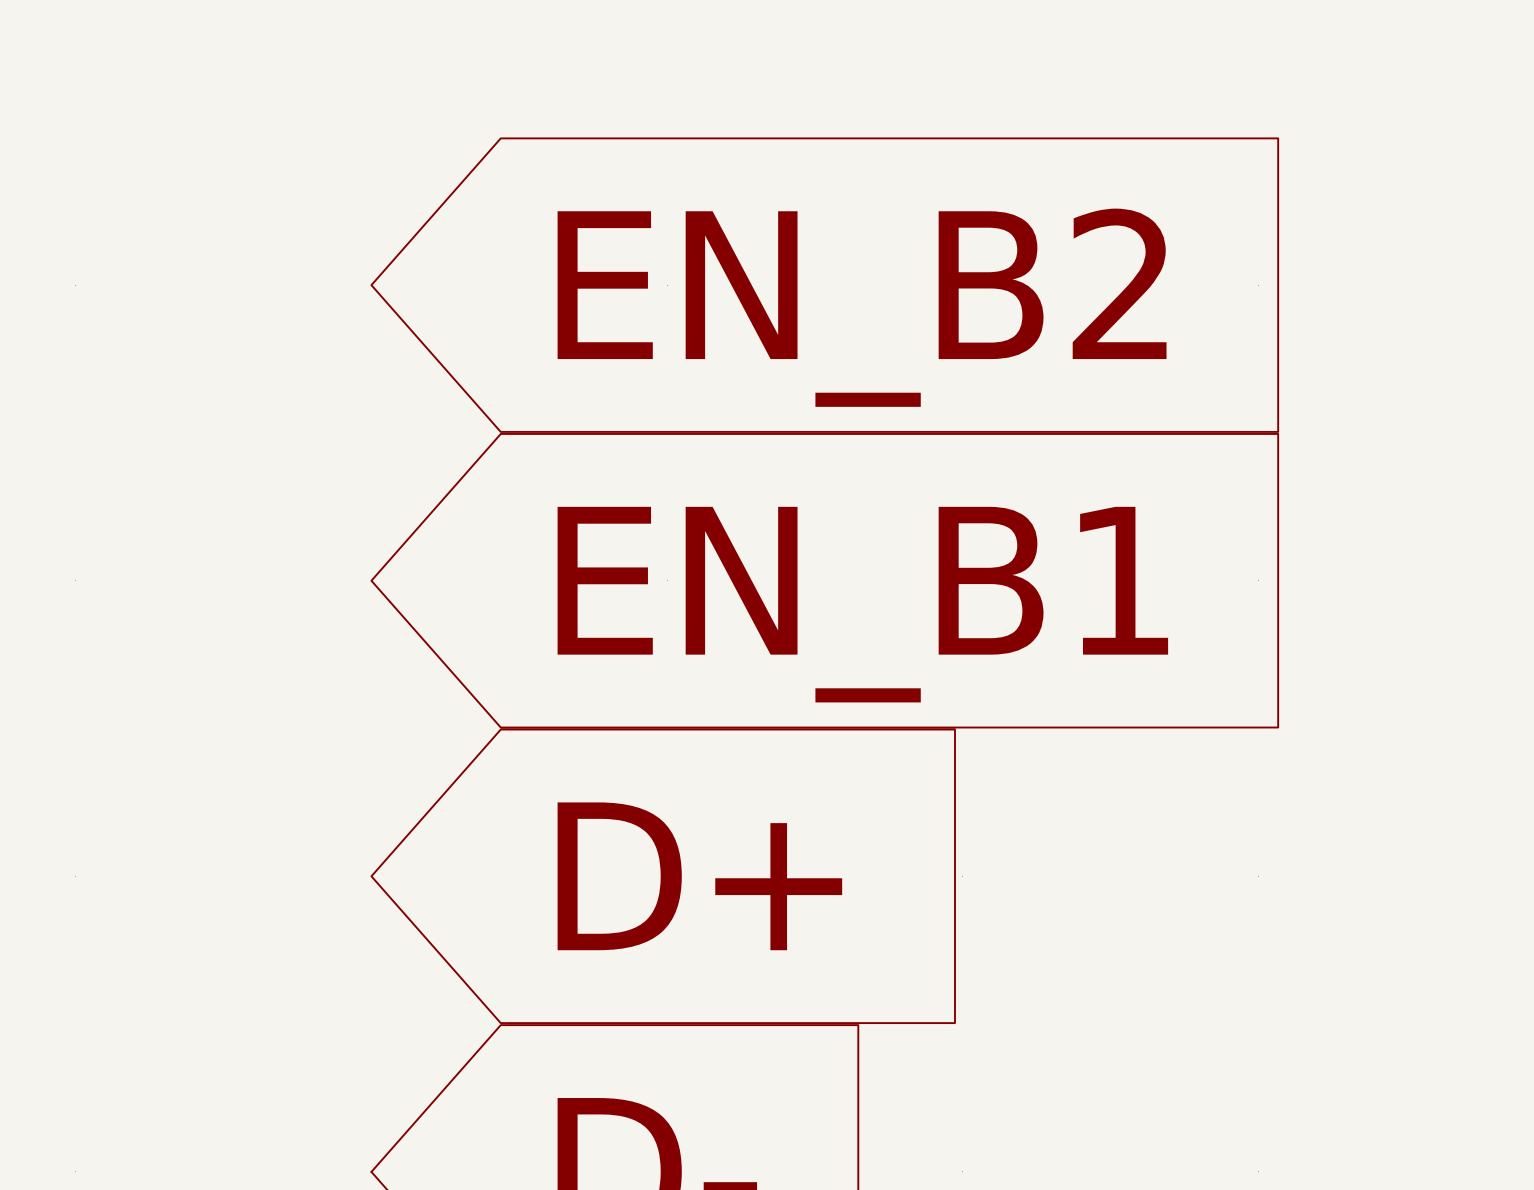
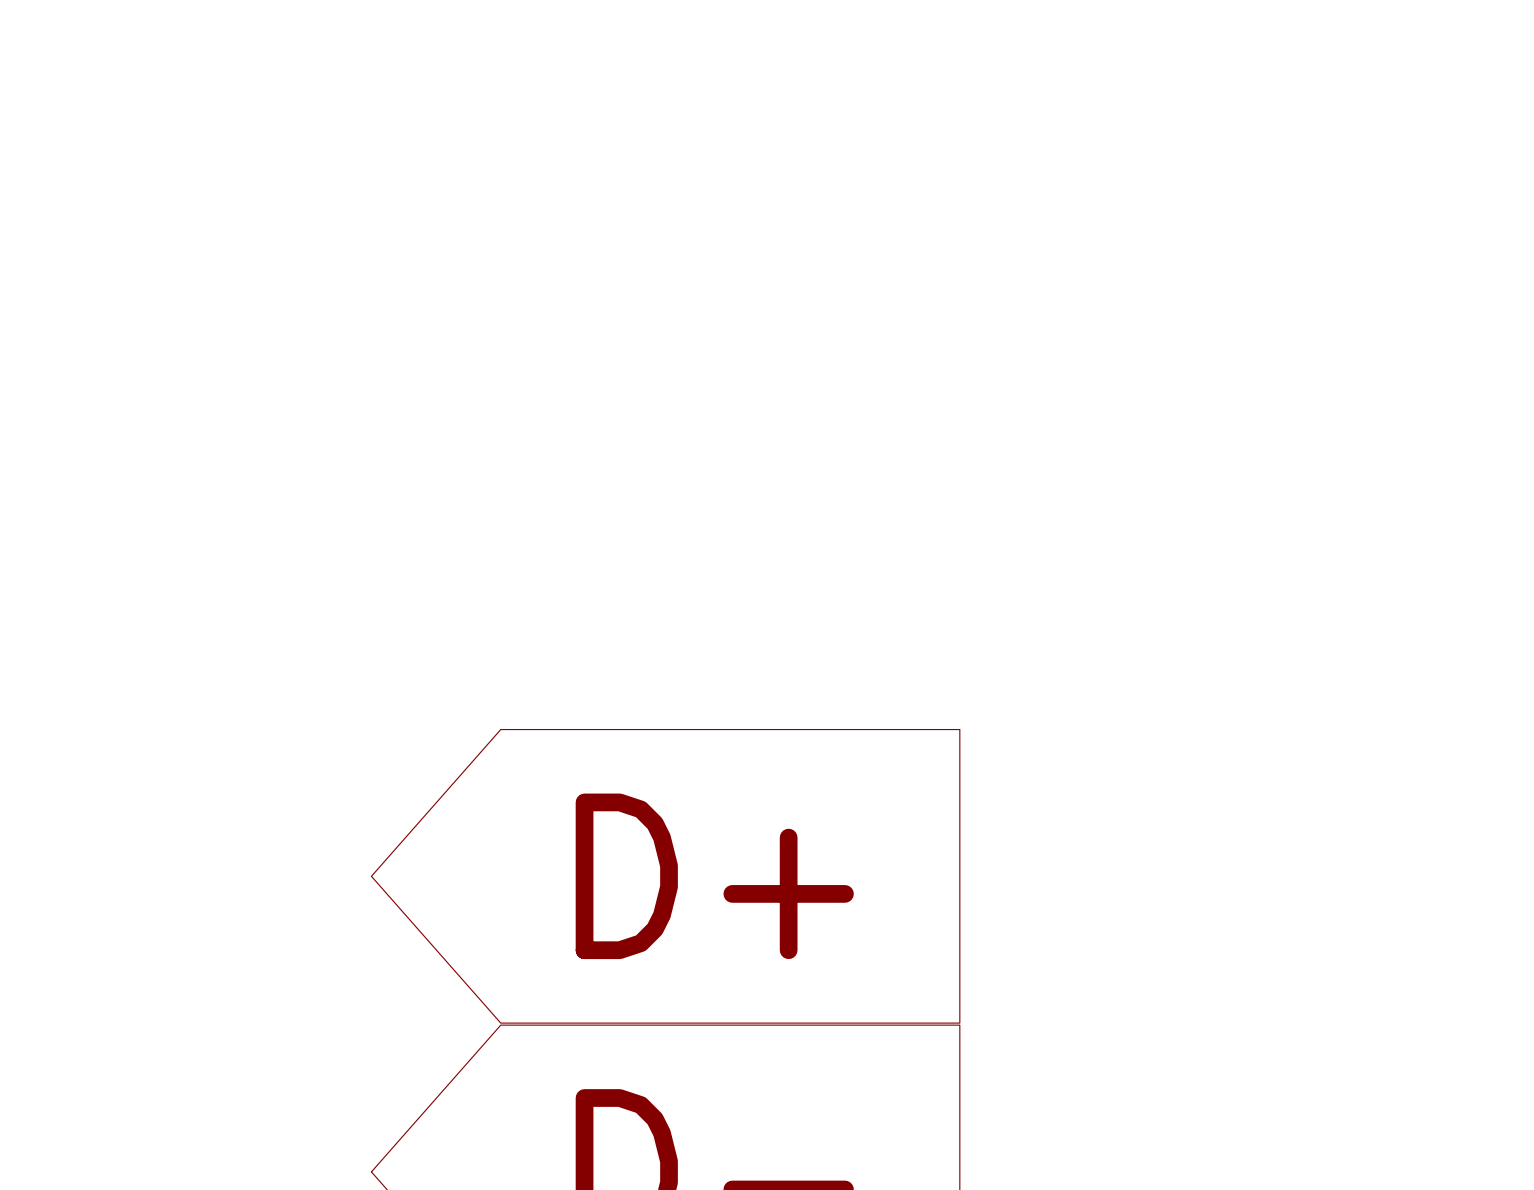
global label: EN_B2 (862, 307) -> none
global label: EN_B1 (862, 604) -> none

